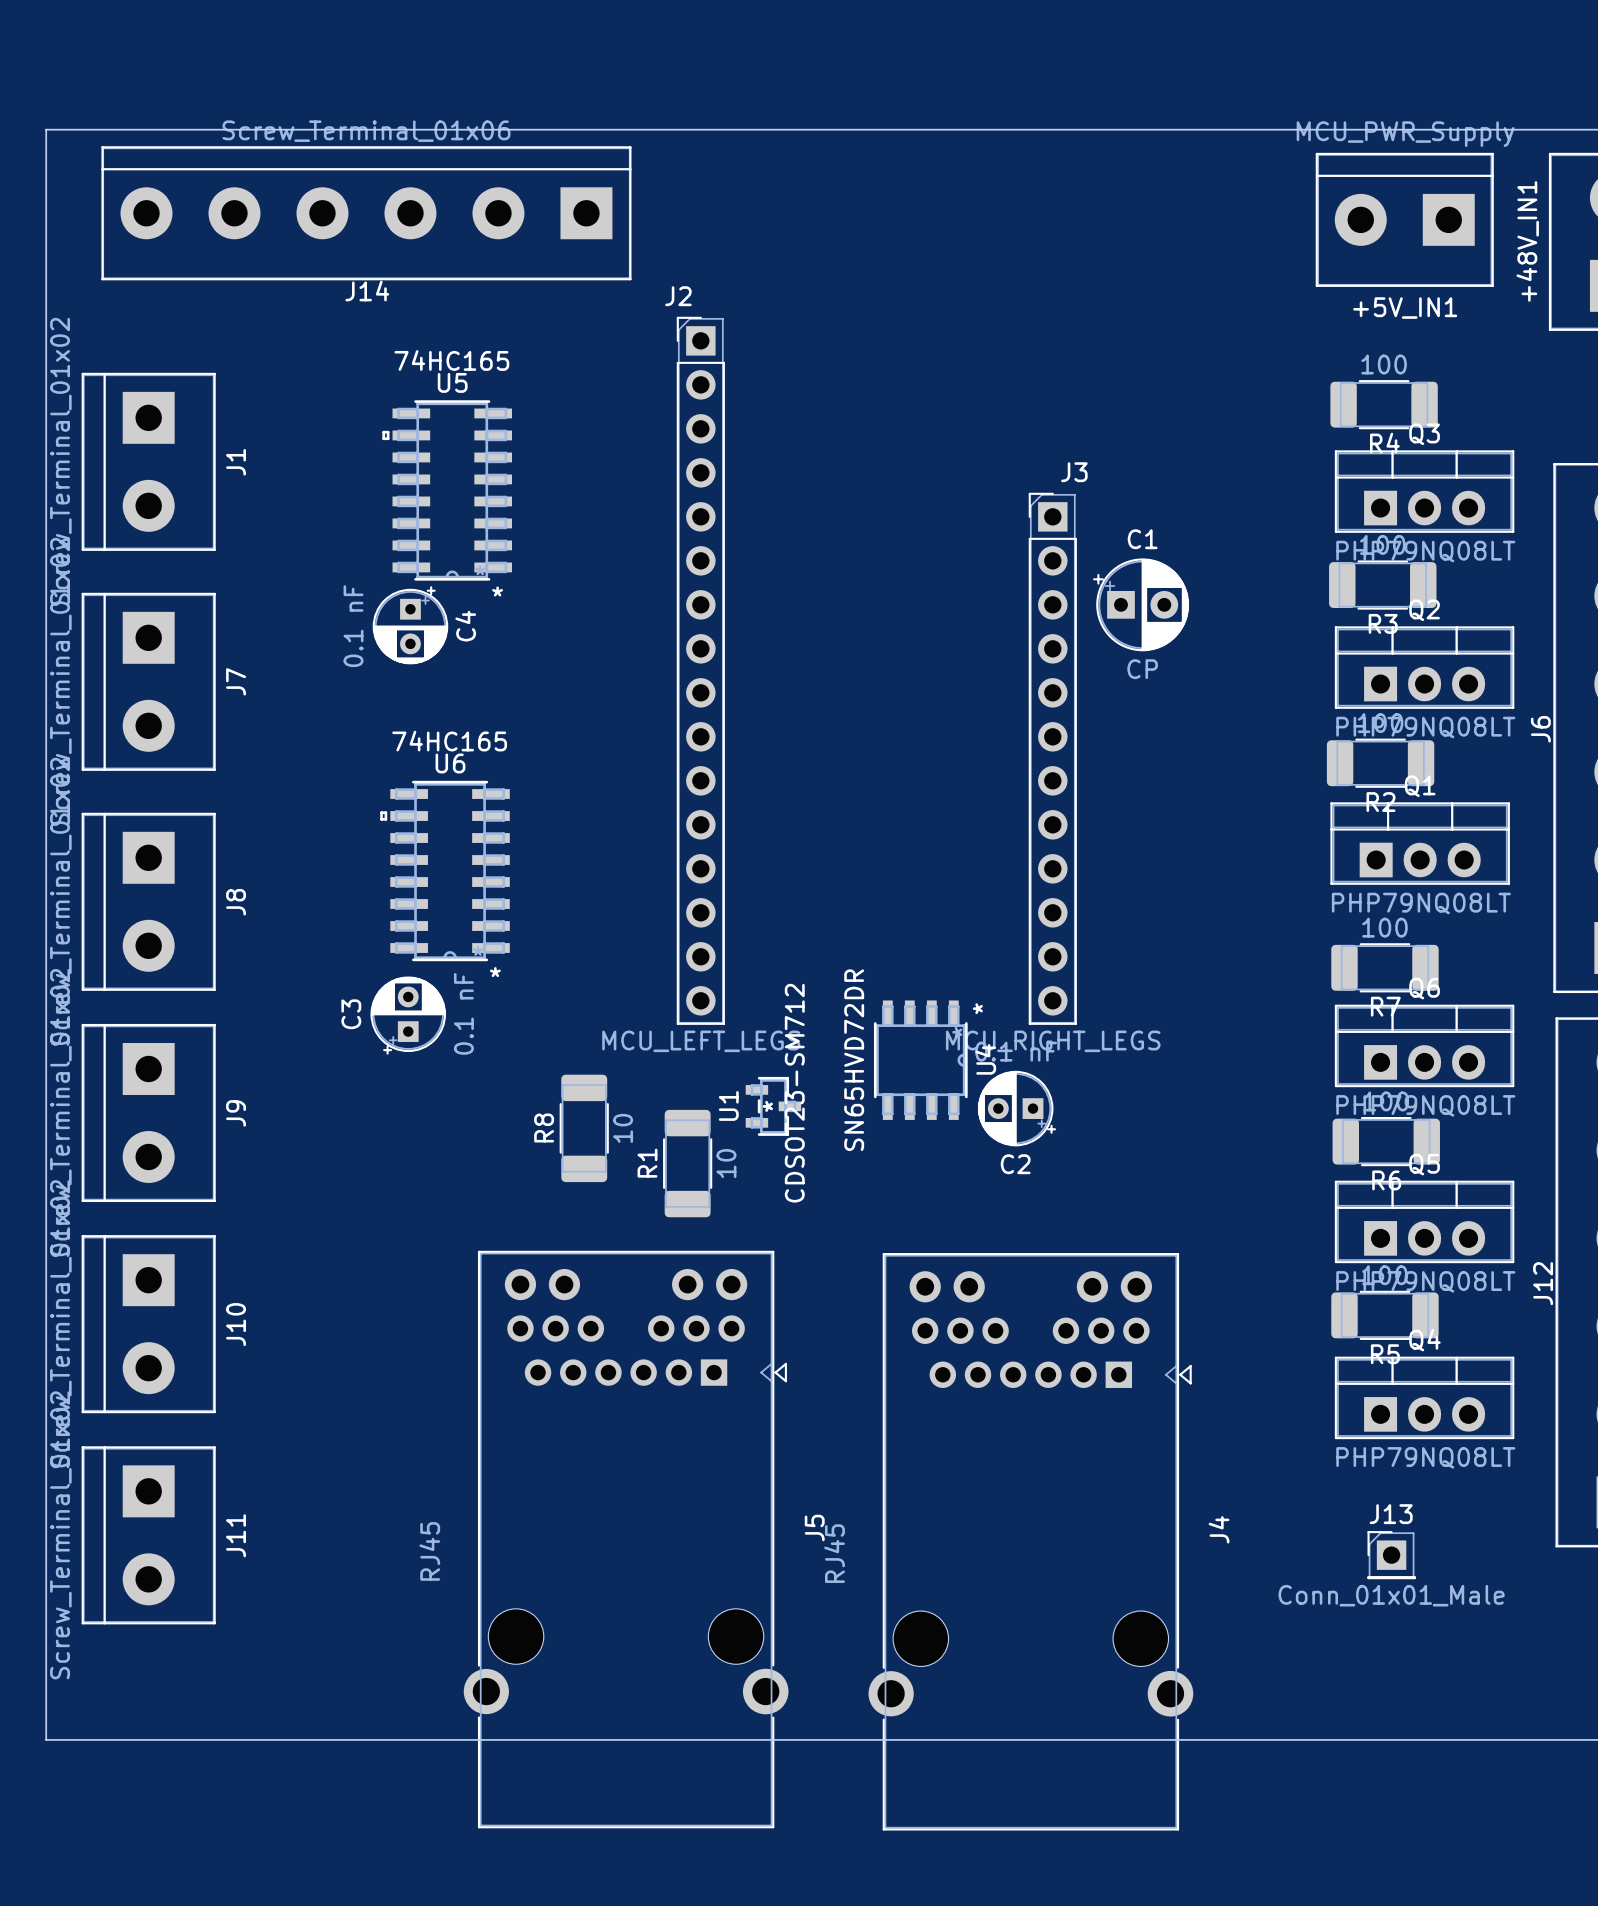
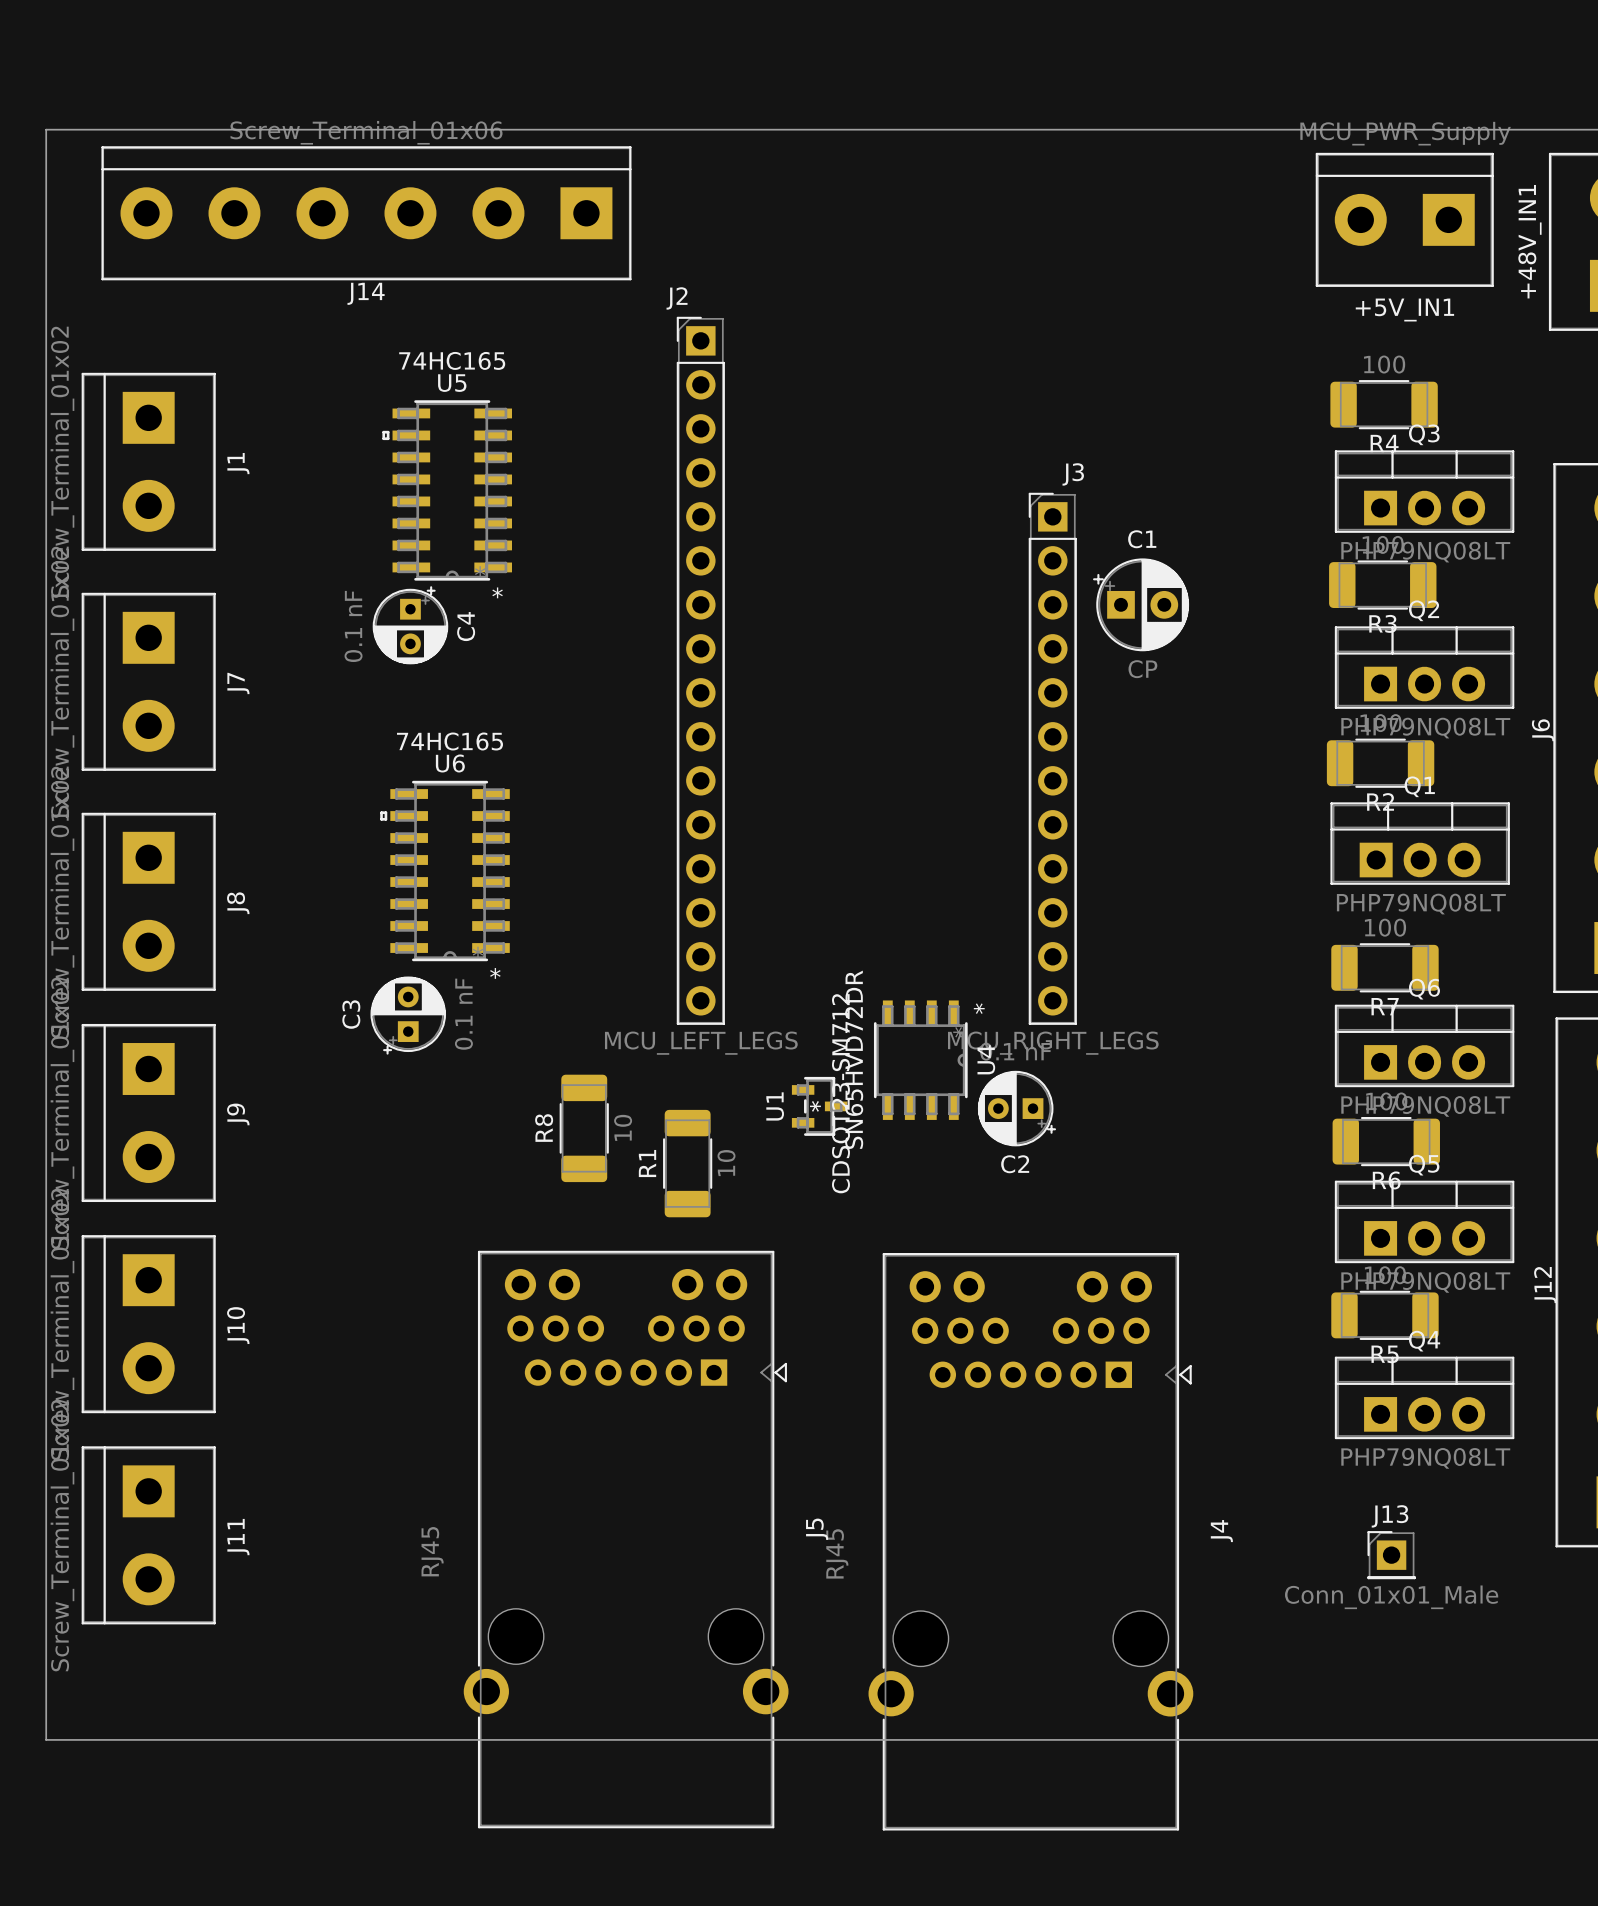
U1 position: (773, 1106) -> (819, 1106)

